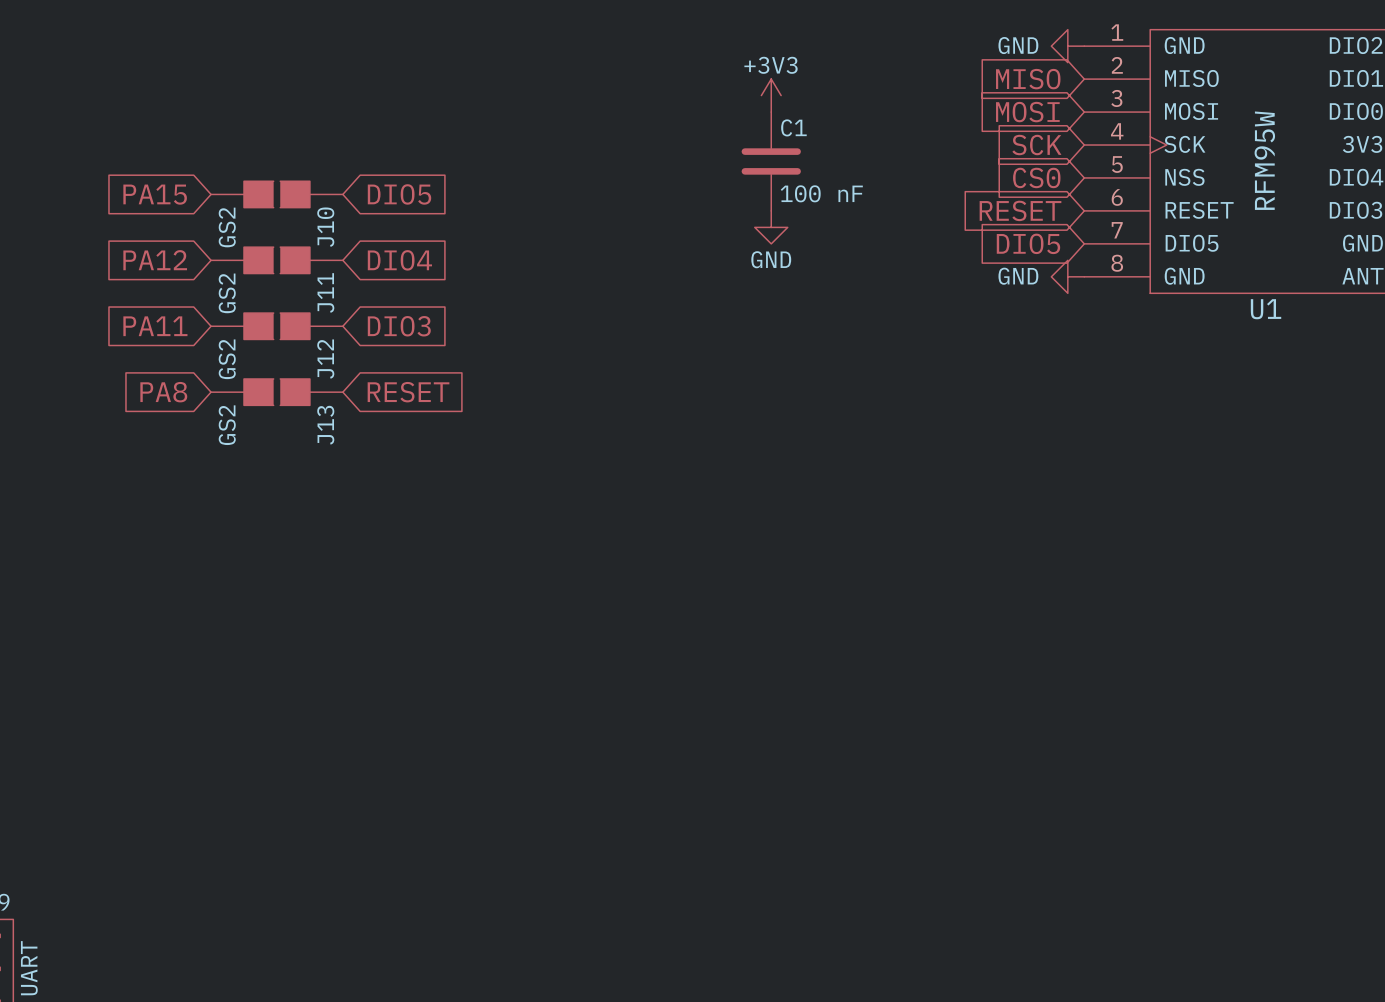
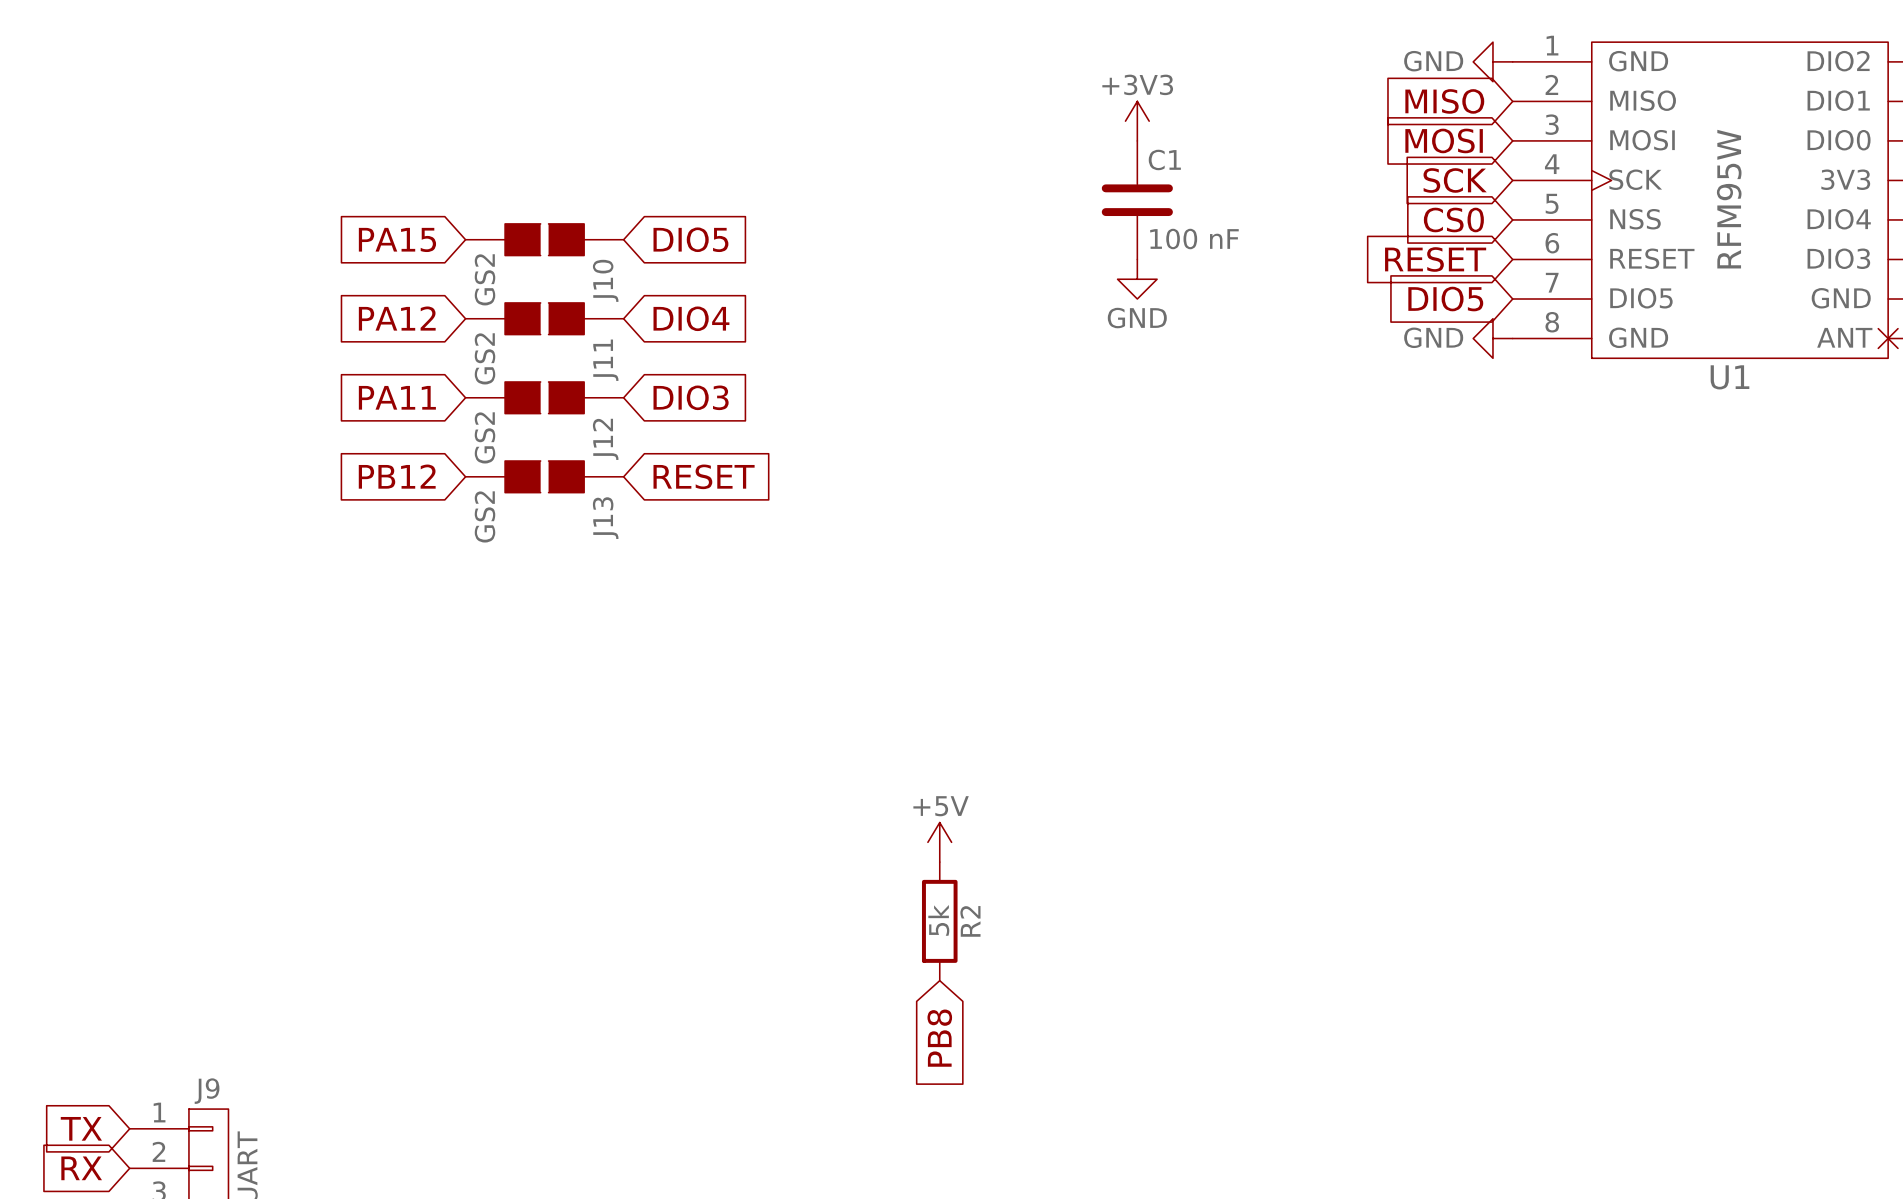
global label: PA8 (163, 392) -> PB12 (397, 476)
power symbol: none -> +5V (939, 842)
R2: none -> 5k (939, 921)
global label: none -> PB8 (939, 1038)

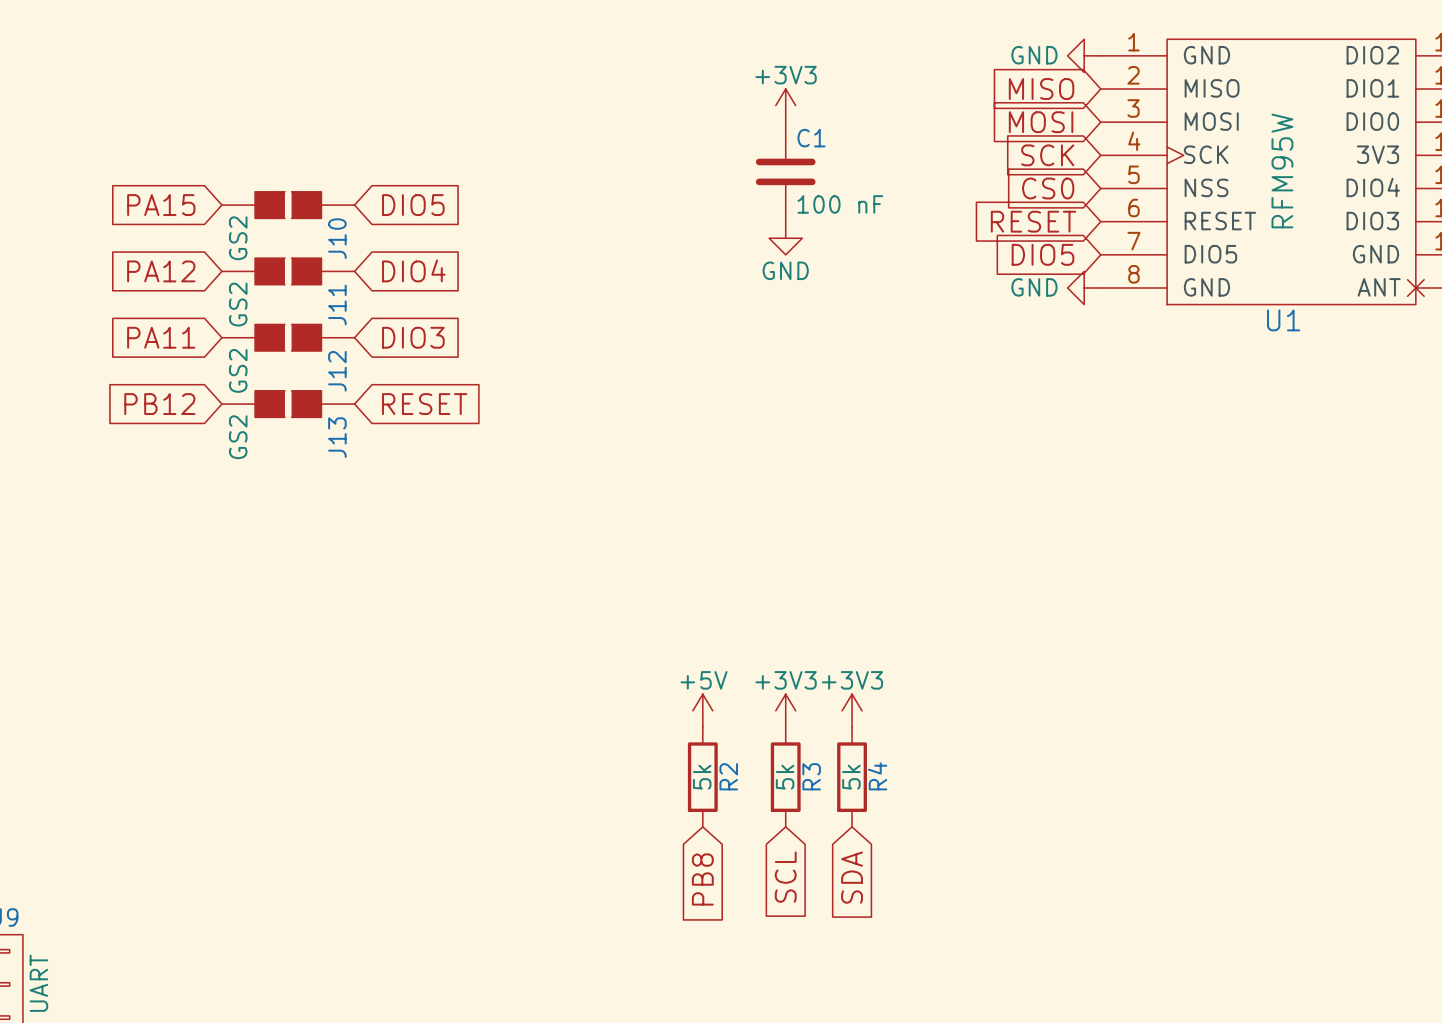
power symbol position: +5V (939, 842) -> +5V (702, 710)
power symbol: none -> +3V3 (785, 710)
power symbol: none -> +3V3 (852, 710)
R2 position: (939, 921) -> (702, 777)
R3: none -> 5k (785, 777)
R4: none -> 5k (852, 777)
global label: none -> SCL (785, 877)
global label position: PB8 (939, 1038) -> PB8 (702, 879)
global label: none -> SDA (852, 877)

